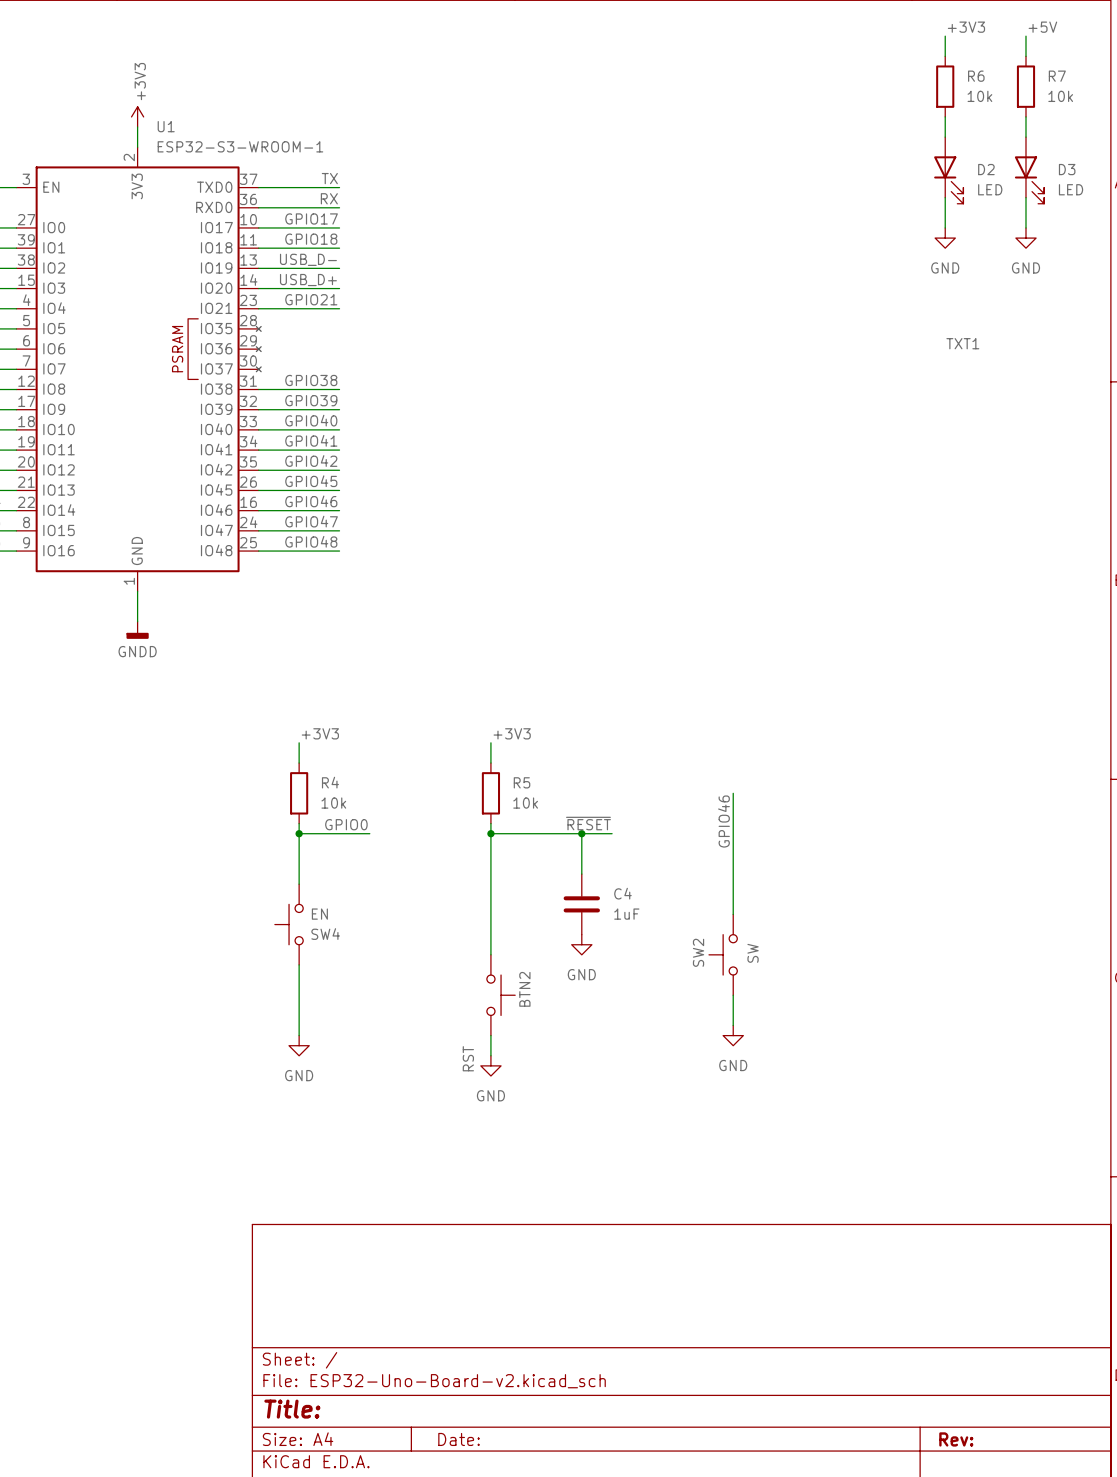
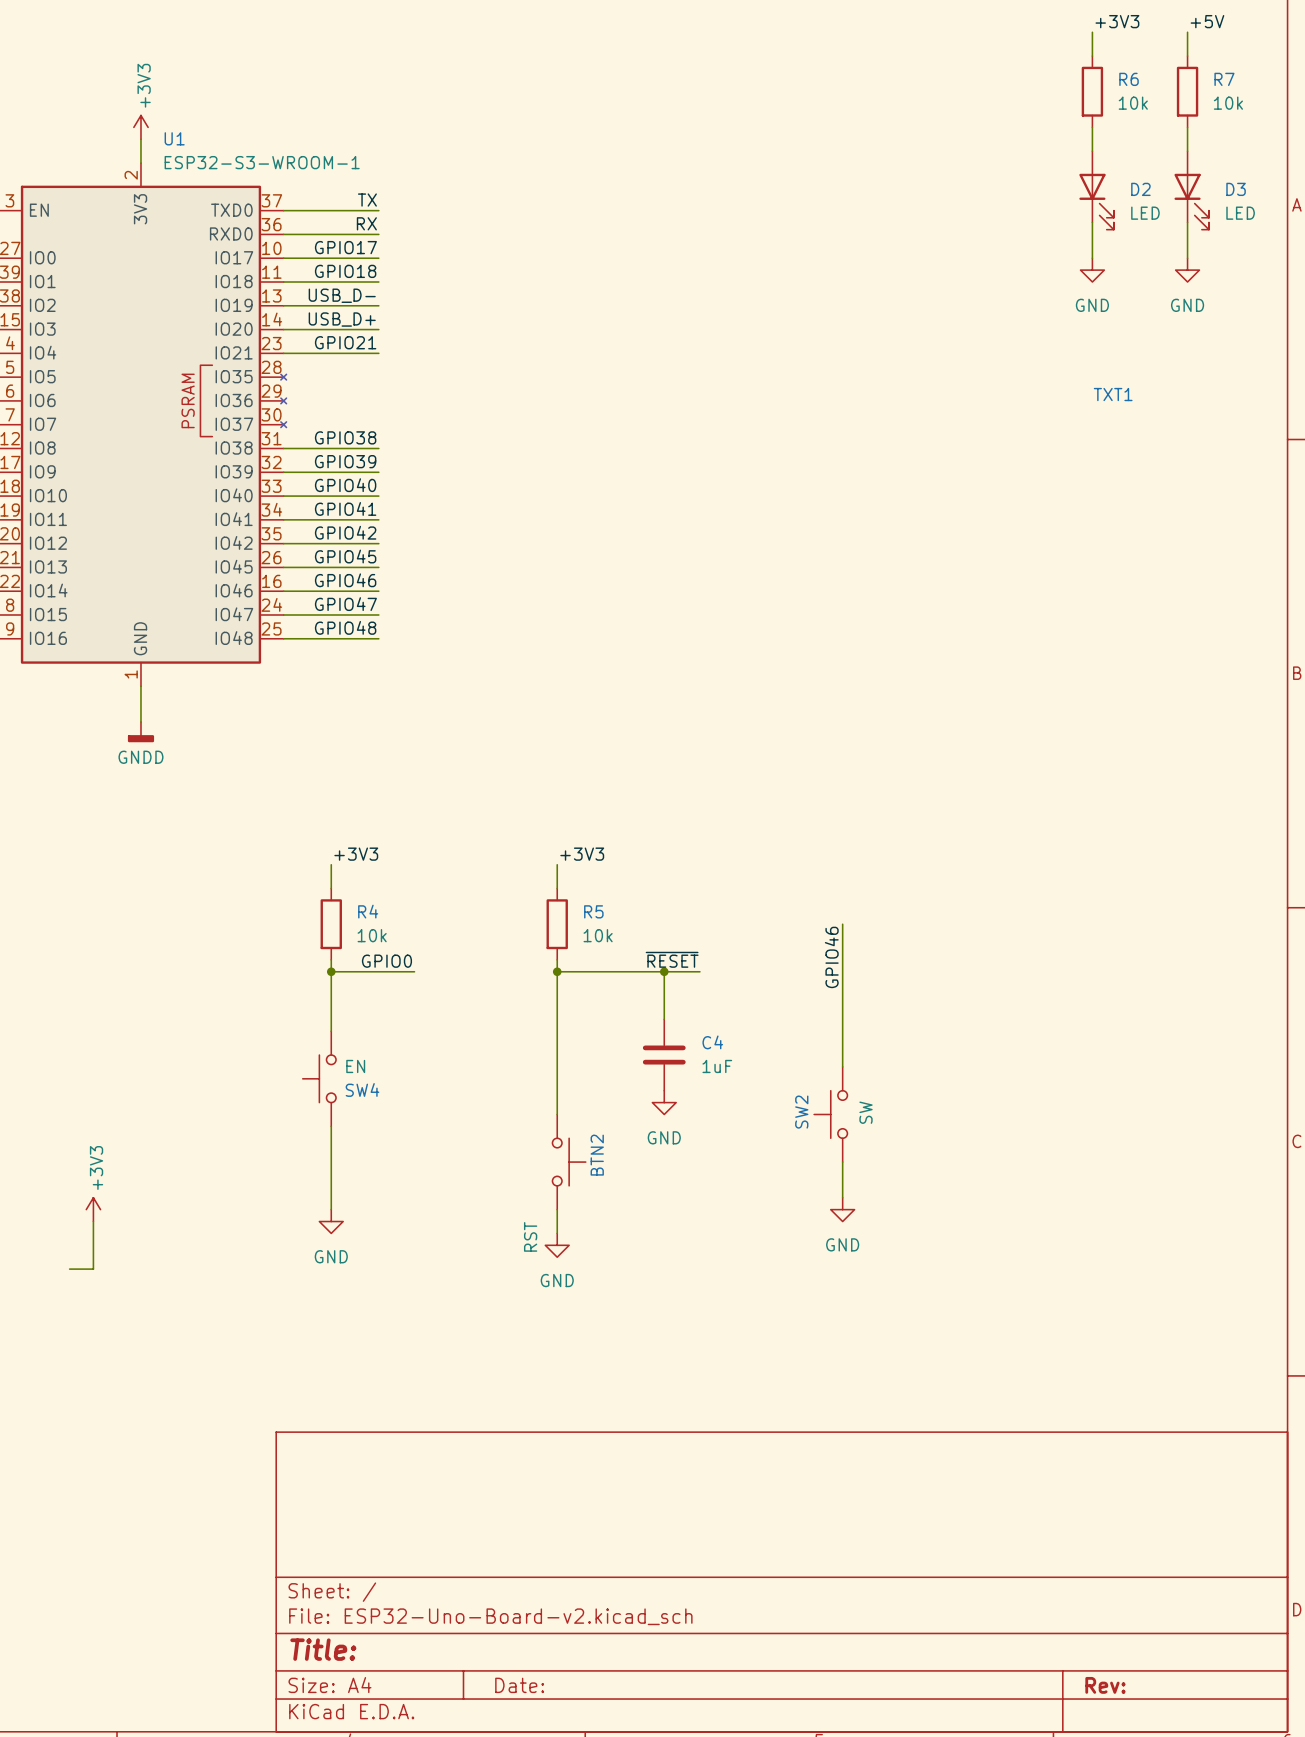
power symbol: none -> +3V3 (93, 1209)
wire: none -> (93, 1221) (93, 1269) (69, 1269)

